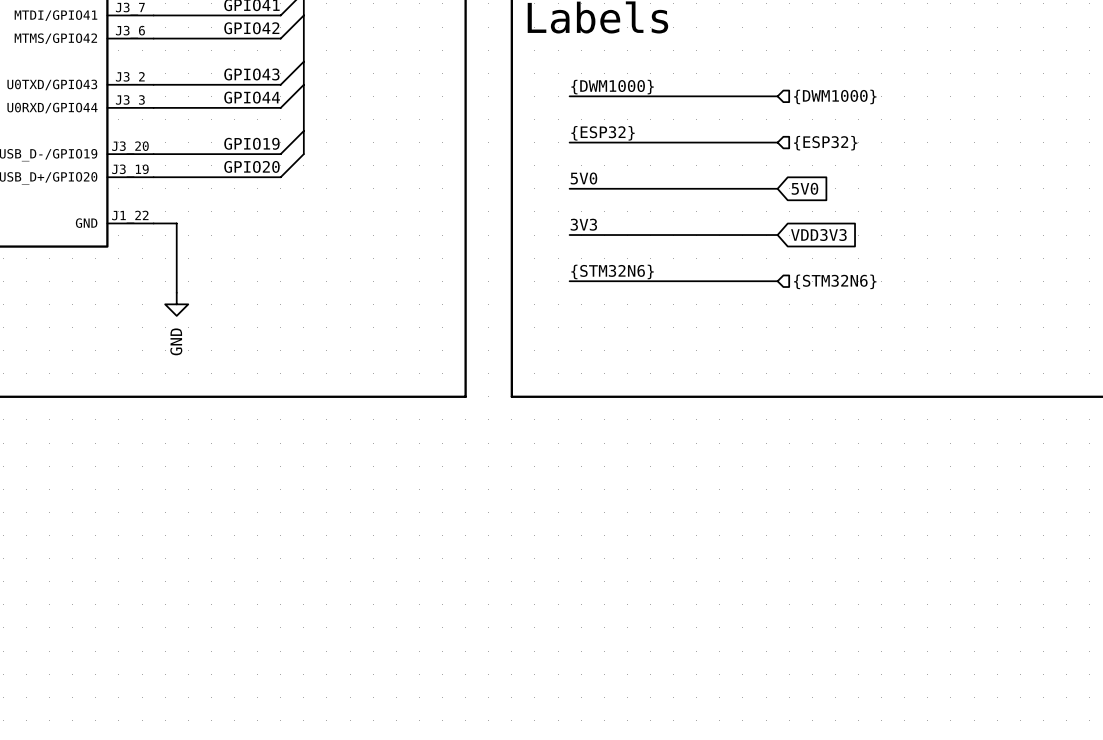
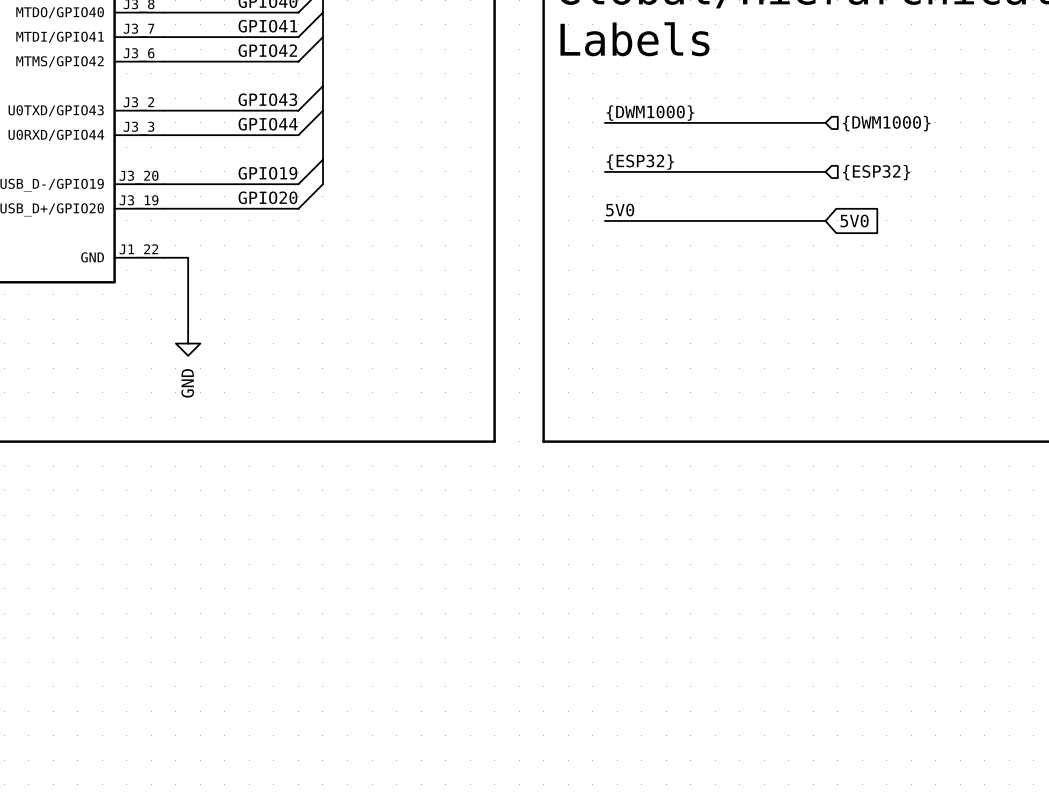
label: 3V3 (583, 224) -> none
wire: (569, 235) (777, 235) -> none
global label: VDD3V3 (818, 235) -> none
label: {STM32N6} (612, 271) -> none
bus: (569, 281) (777, 281) -> none
hierarchical label: {STM32N6} (835, 281) -> none

